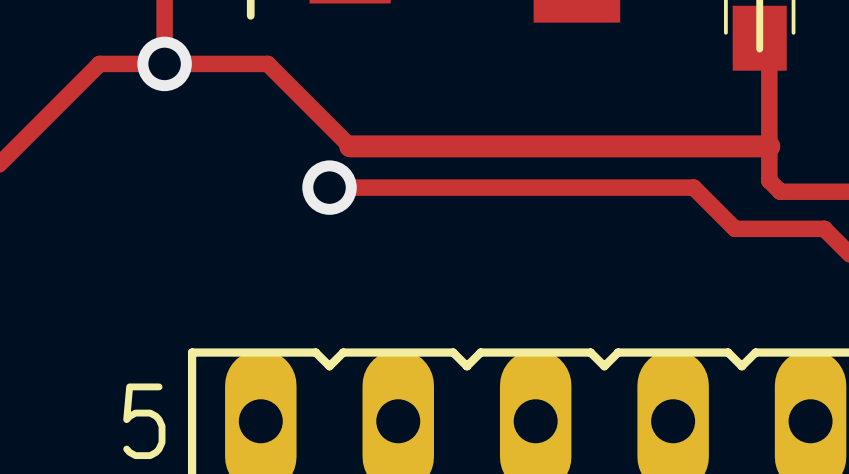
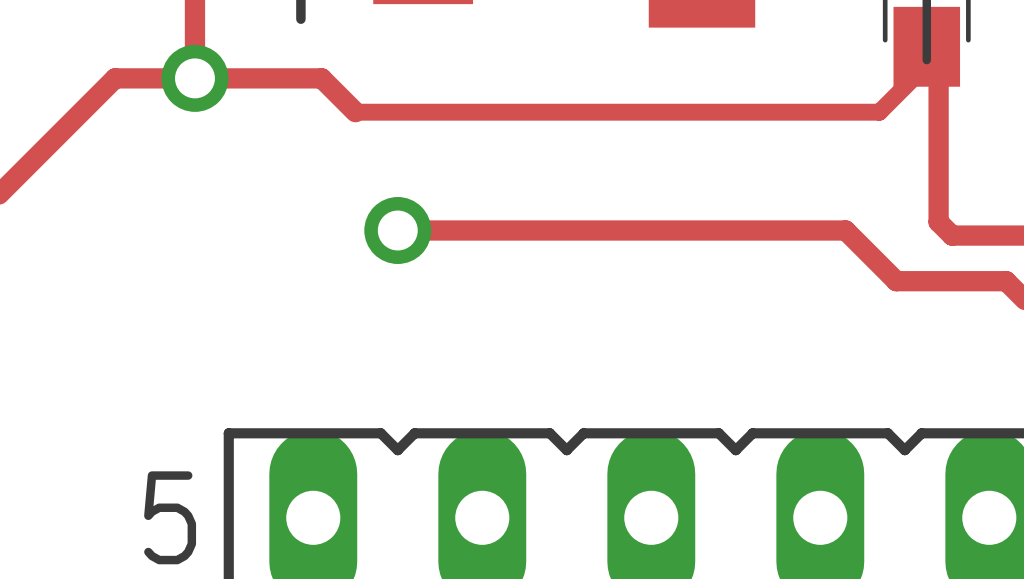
track: (295, 91) (350, 146) (769, 146) -> (355, 112) (879, 112) (926, 64) (926, 46)

